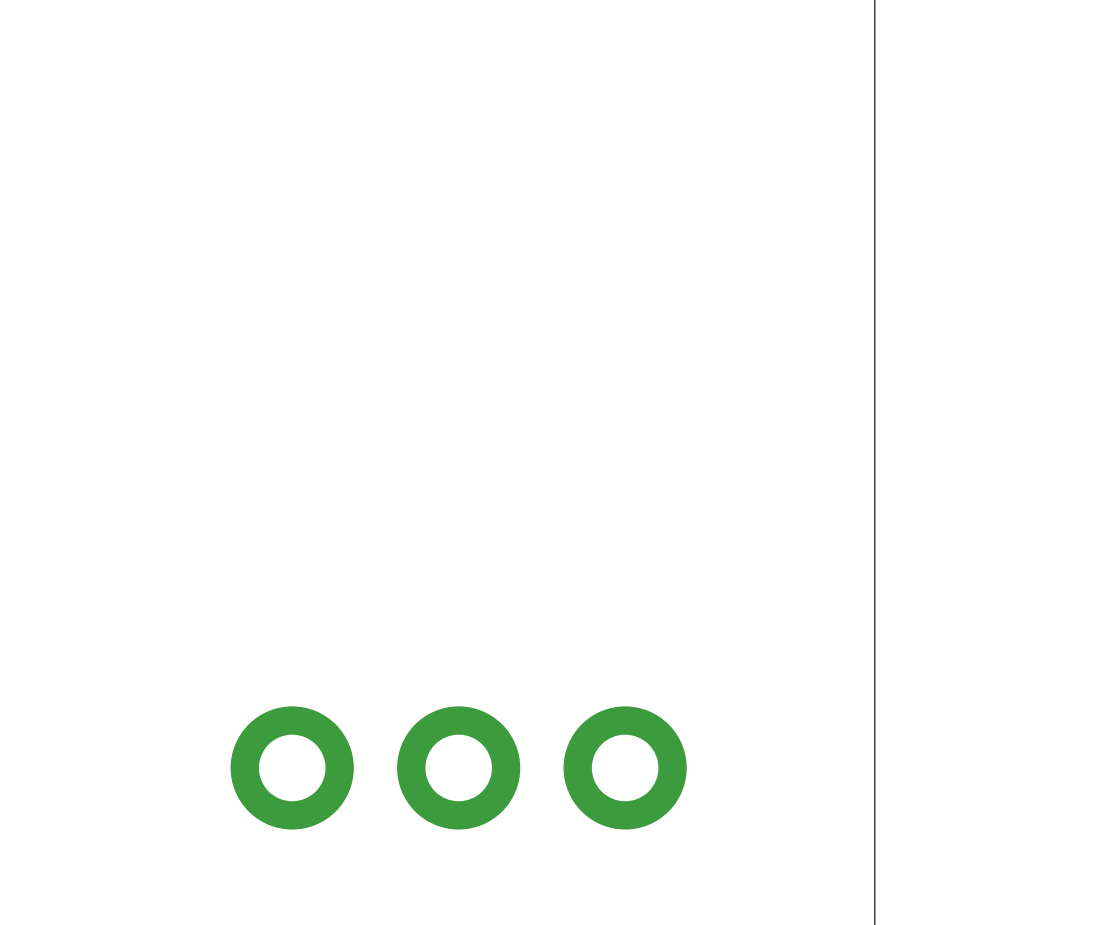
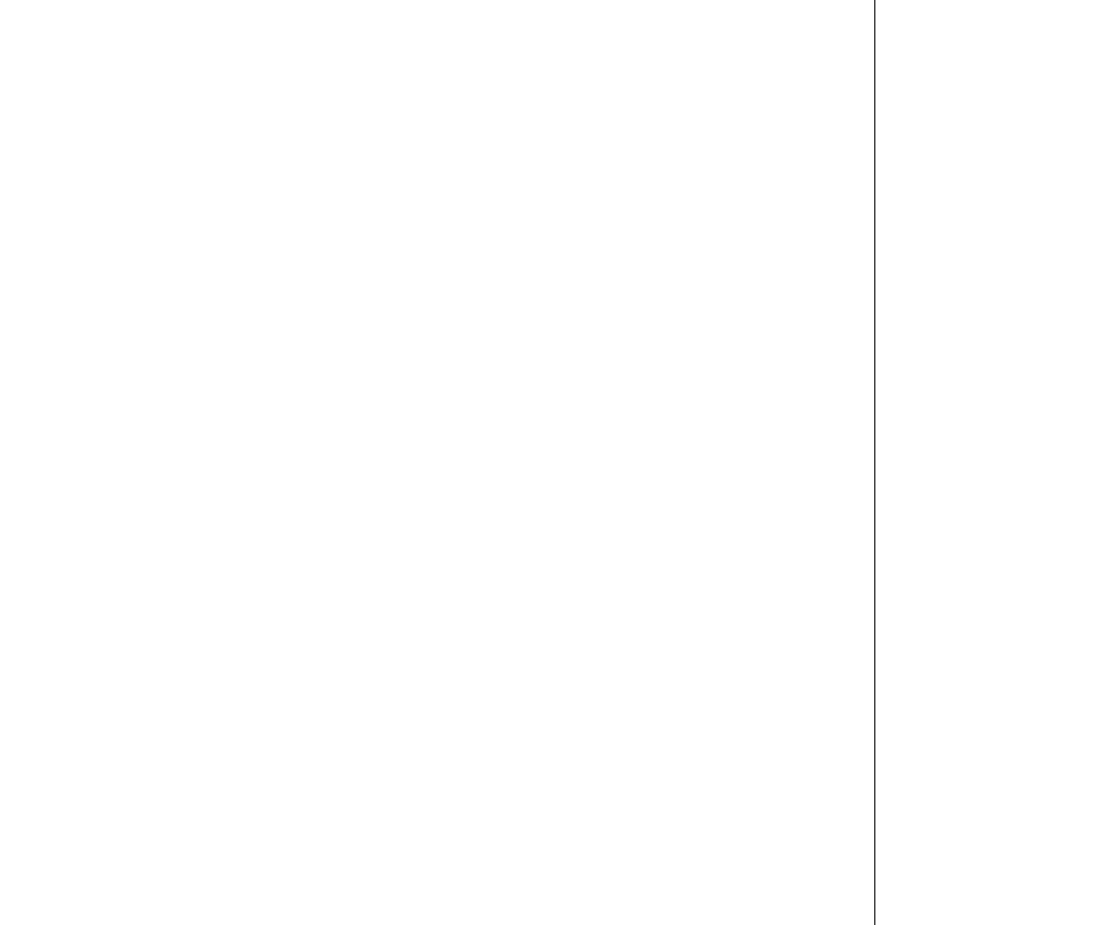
part: (458, 767) -> none

